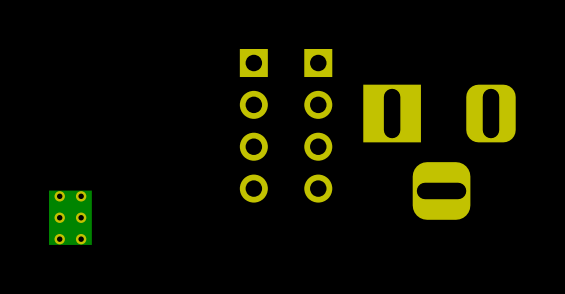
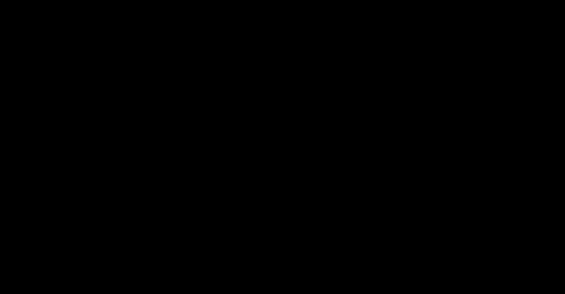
part: (253, 125) -> none
part: (318, 125) -> none
part: (439, 152) -> none
part: (70, 217) -> none

